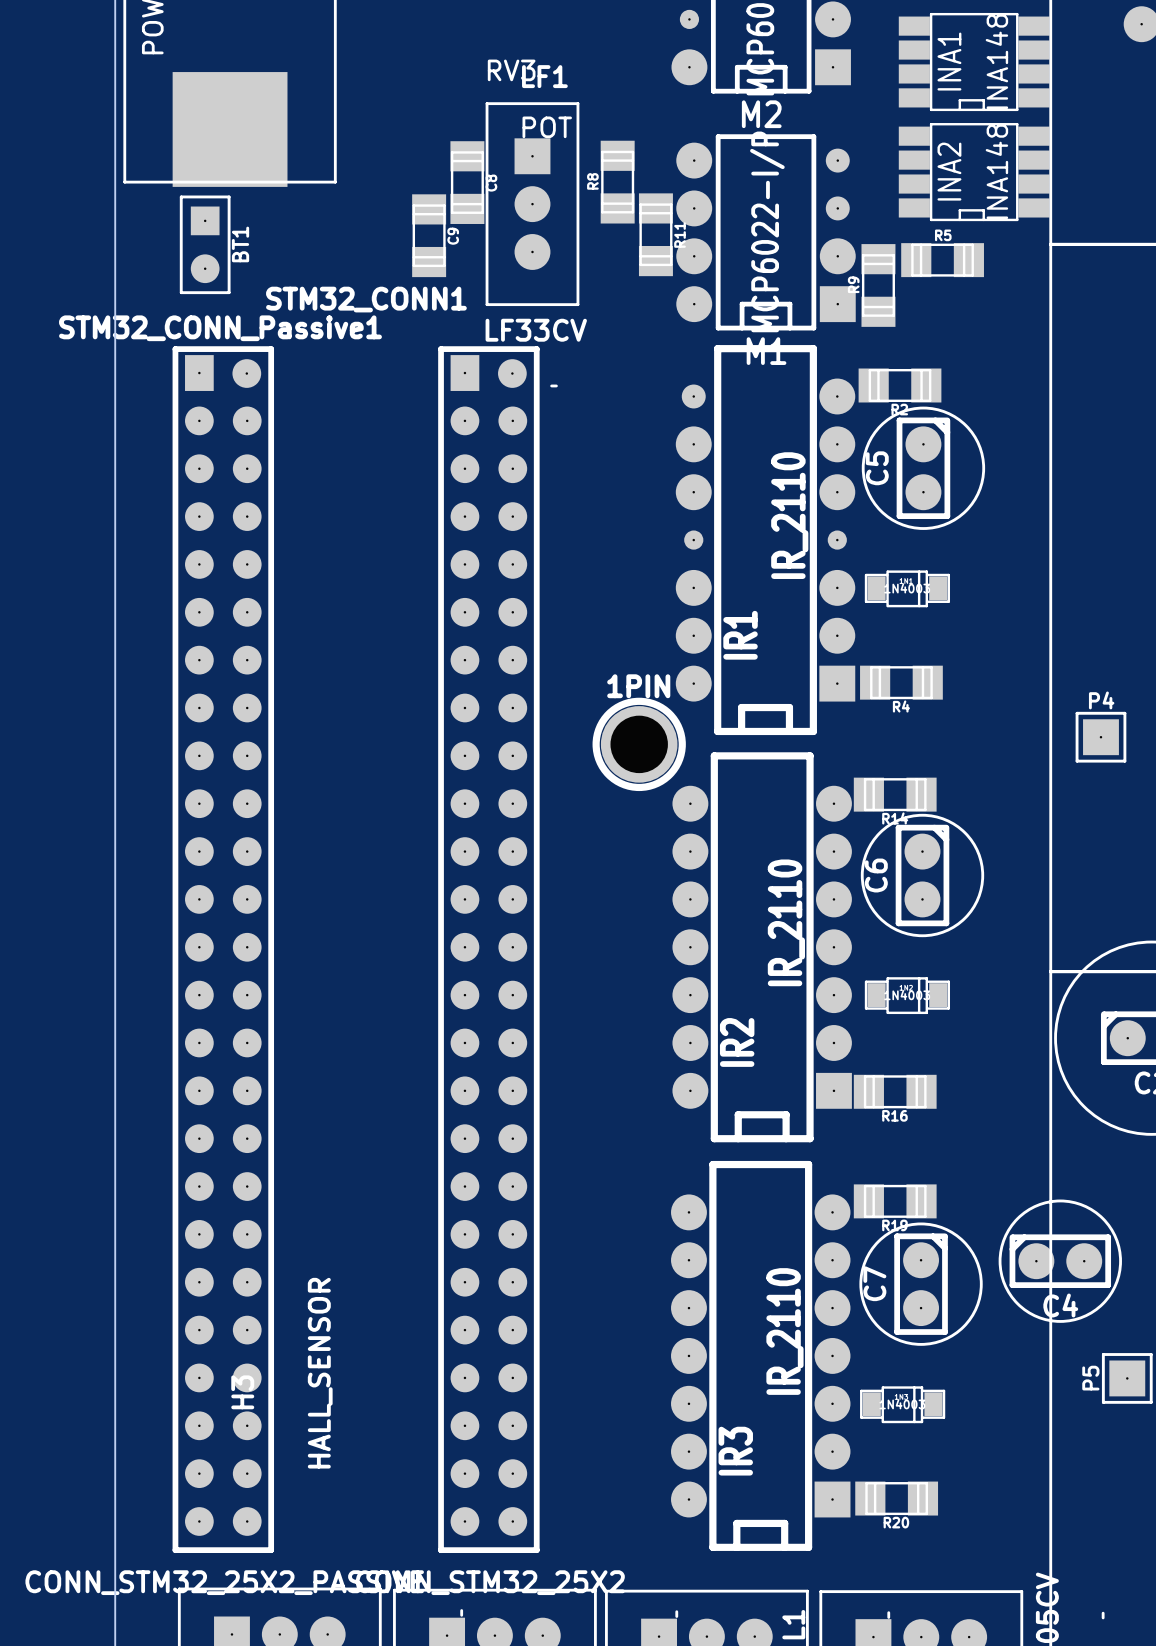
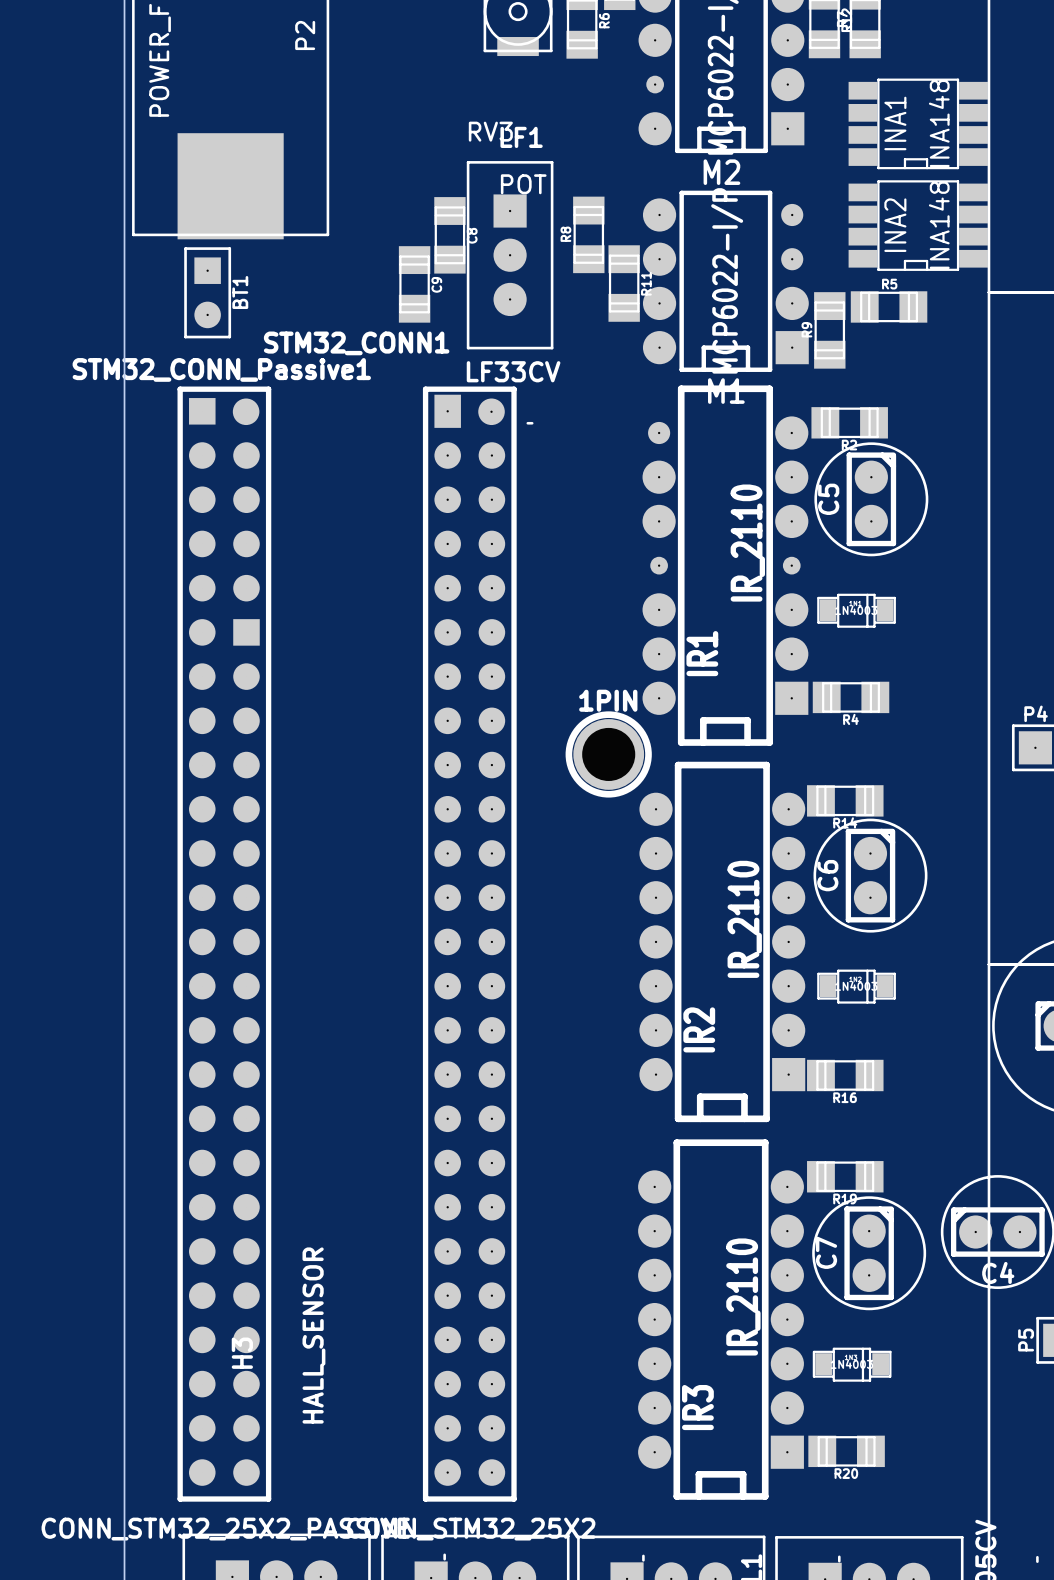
STM32_CONN_Passive1 footprint: [172, 346, 275, 1554] -> [177, 386, 272, 1502]

